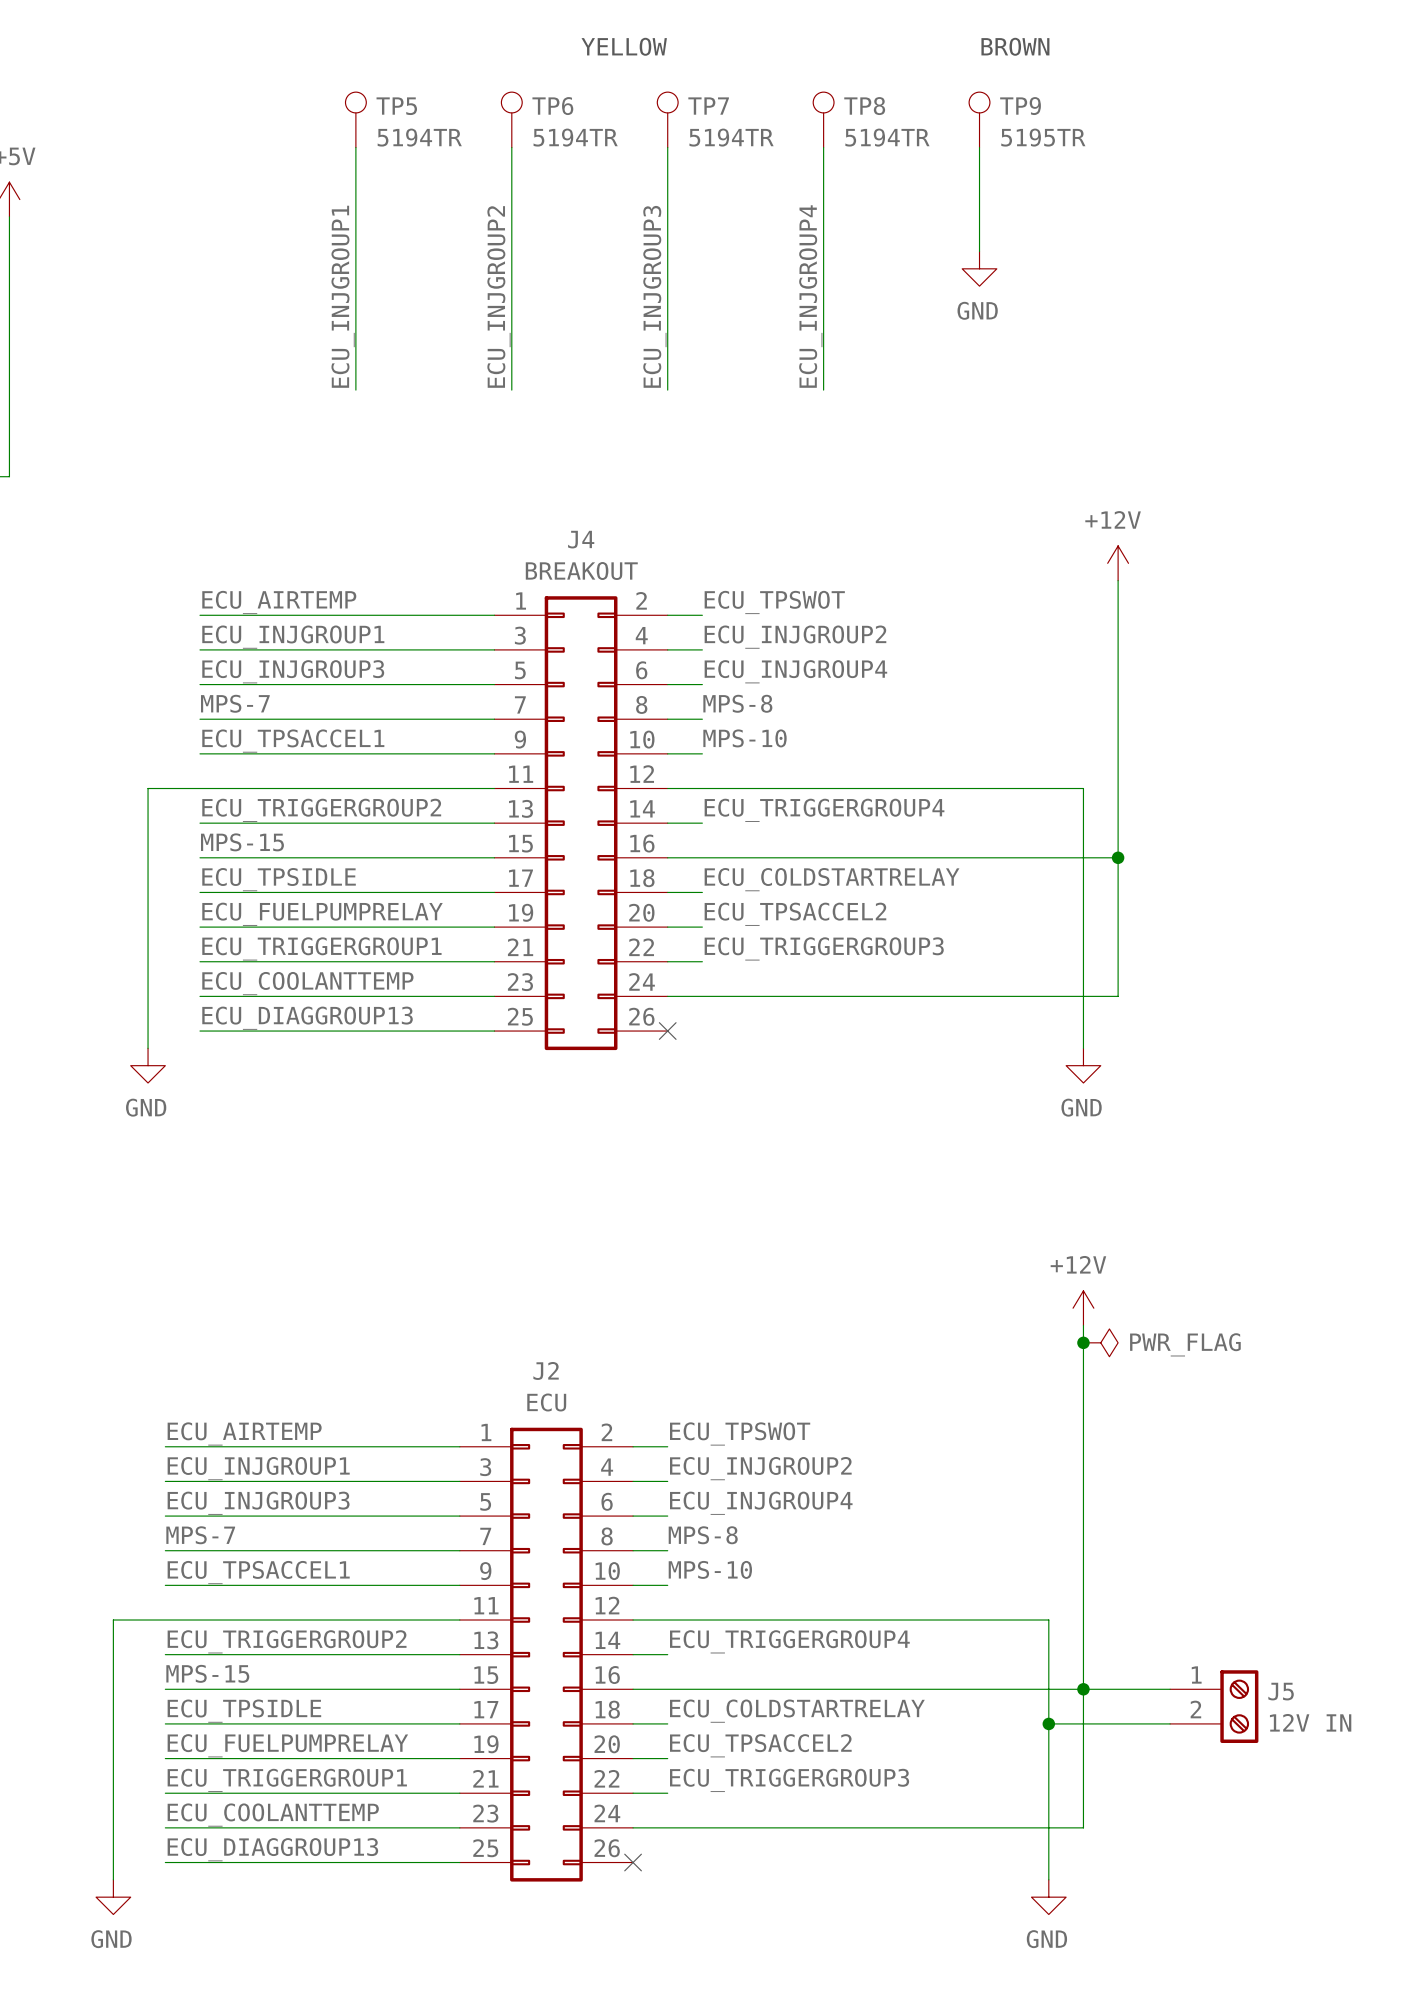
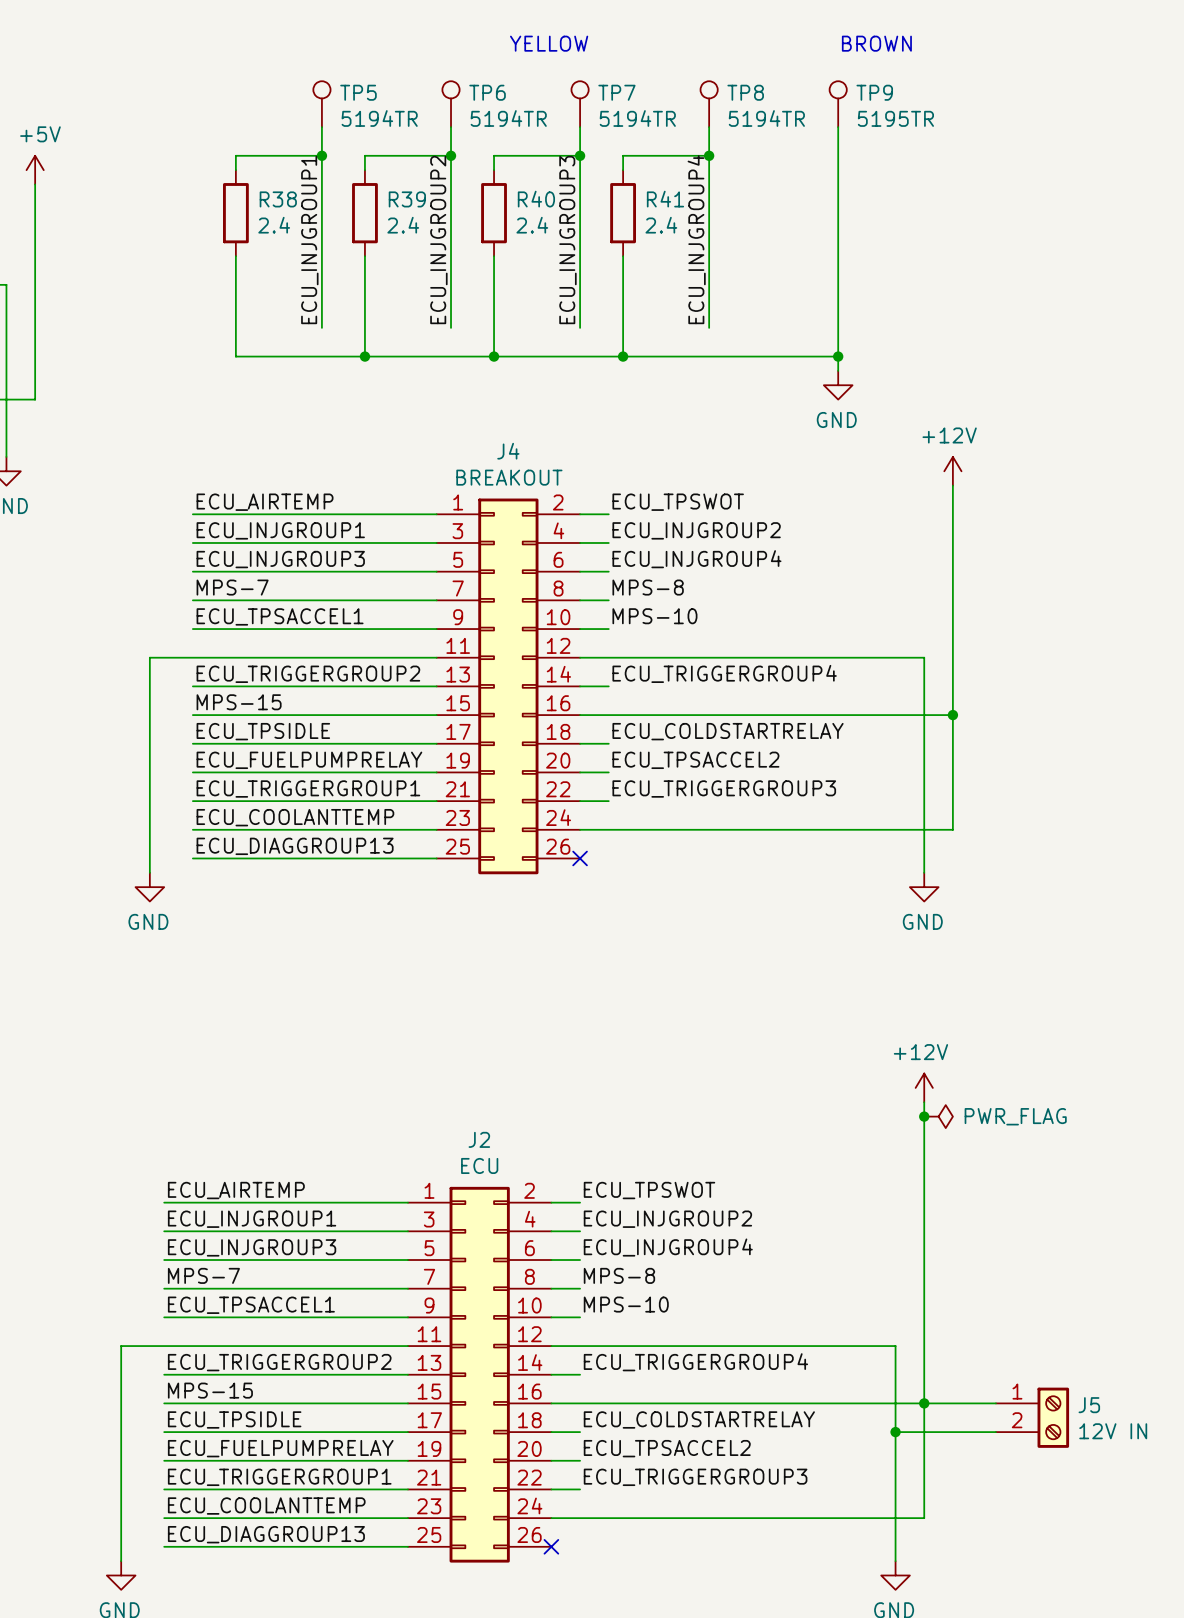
wire: none -> (321, 155) (235, 155) (235, 170)
junction: none -> (321, 155)
wire: none -> (451, 155) (364, 155) (364, 170)
junction: none -> (451, 155)
wire: none -> (580, 155) (494, 155) (494, 170)
junction: none -> (580, 155)
wire: none -> (709, 155) (623, 155) (623, 170)
junction: none -> (709, 155)
R38: none -> 2.4 (235, 213)
R39: none -> 2.4 (364, 213)
R40: none -> 2.4 (494, 213)
R41: none -> 2.4 (623, 213)
wire: none -> (838, 213) (838, 370)
power symbol position: GND (979, 268) -> GND (838, 385)
wire: none -> (235, 256) (235, 356) (838, 356)
wire: none -> (364, 256) (364, 356)
wire: none -> (494, 256) (494, 356)
wire: none -> (623, 256) (623, 356)
junction: none -> (364, 356)
junction: none -> (494, 356)
junction: none -> (623, 356)
junction: none -> (838, 356)

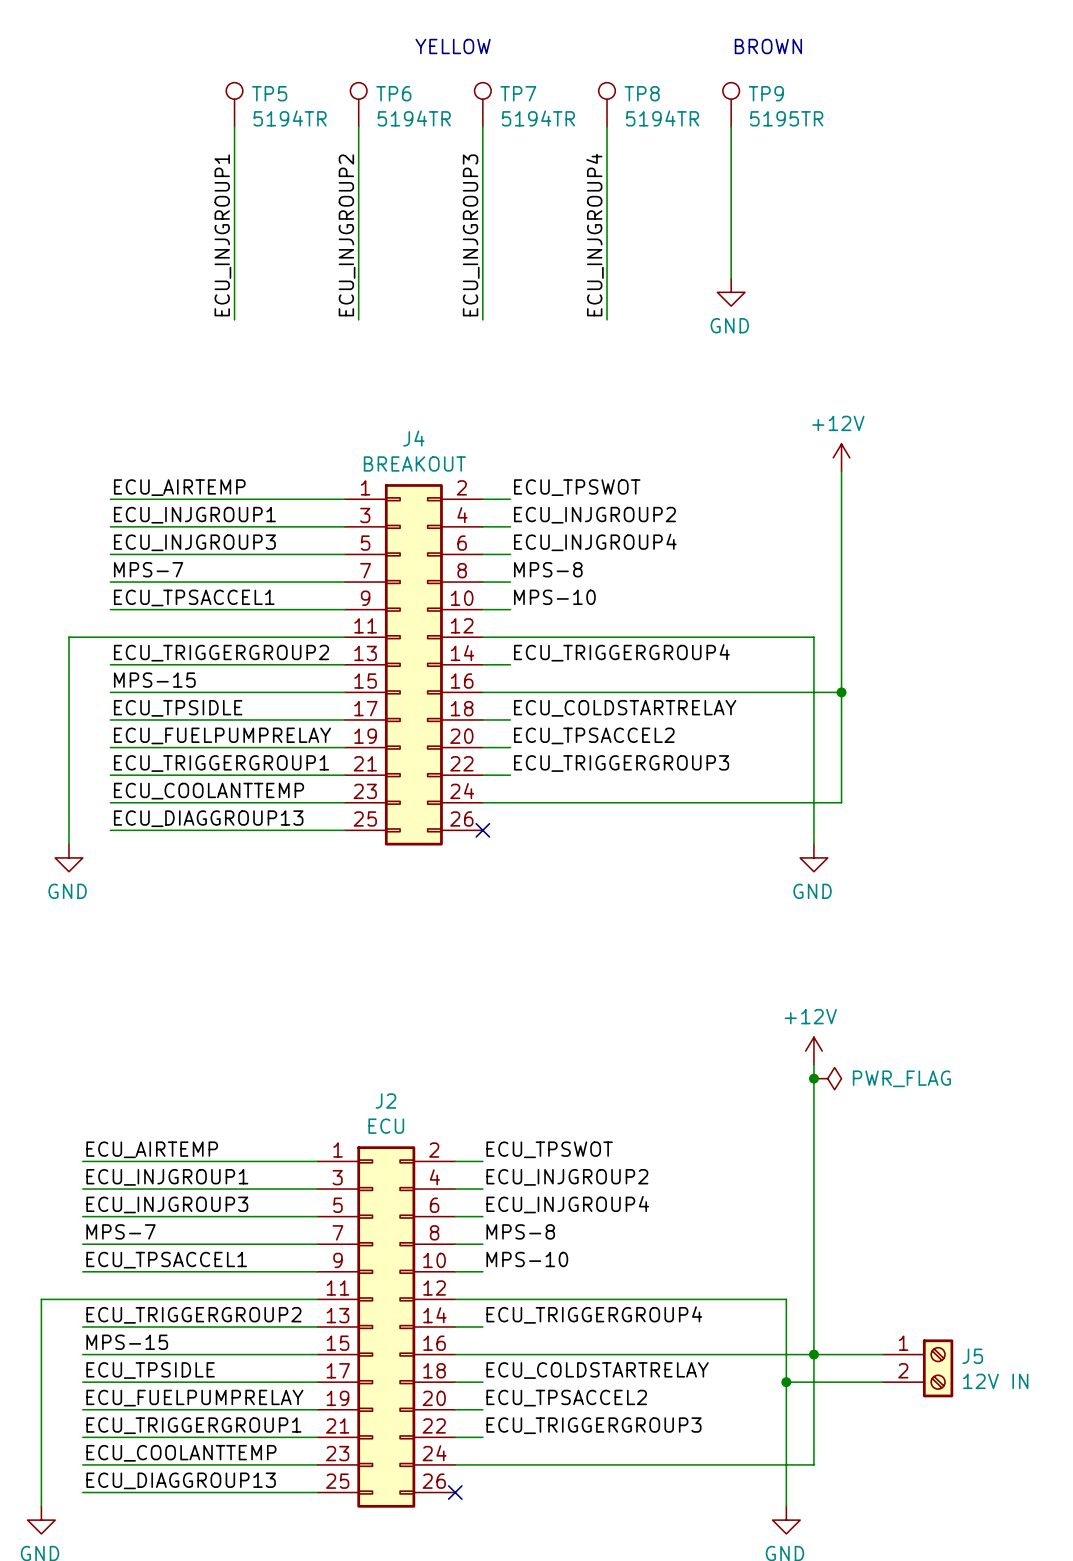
wire: (321, 155) (235, 155) (235, 170) -> none
junction: (321, 155) -> none
wire: (451, 155) (364, 155) (364, 170) -> none
junction: (451, 155) -> none
wire: (580, 155) (494, 155) (494, 170) -> none
junction: (580, 155) -> none
wire: (709, 155) (623, 155) (623, 170) -> none
junction: (709, 155) -> none
R38: 2.4 (235, 213) -> none
R39: 2.4 (364, 213) -> none
R40: 2.4 (494, 213) -> none
R41: 2.4 (623, 213) -> none
wire: (235, 256) (235, 356) (838, 356) -> none
wire: (364, 256) (364, 356) -> none
wire: (494, 256) (494, 356) -> none
wire: (623, 256) (623, 356) -> none
wire: (838, 284) (838, 370) -> none
junction: (364, 356) -> none
junction: (494, 356) -> none
junction: (623, 356) -> none
junction: (838, 356) -> none
power symbol position: GND (838, 385) -> GND (731, 292)

